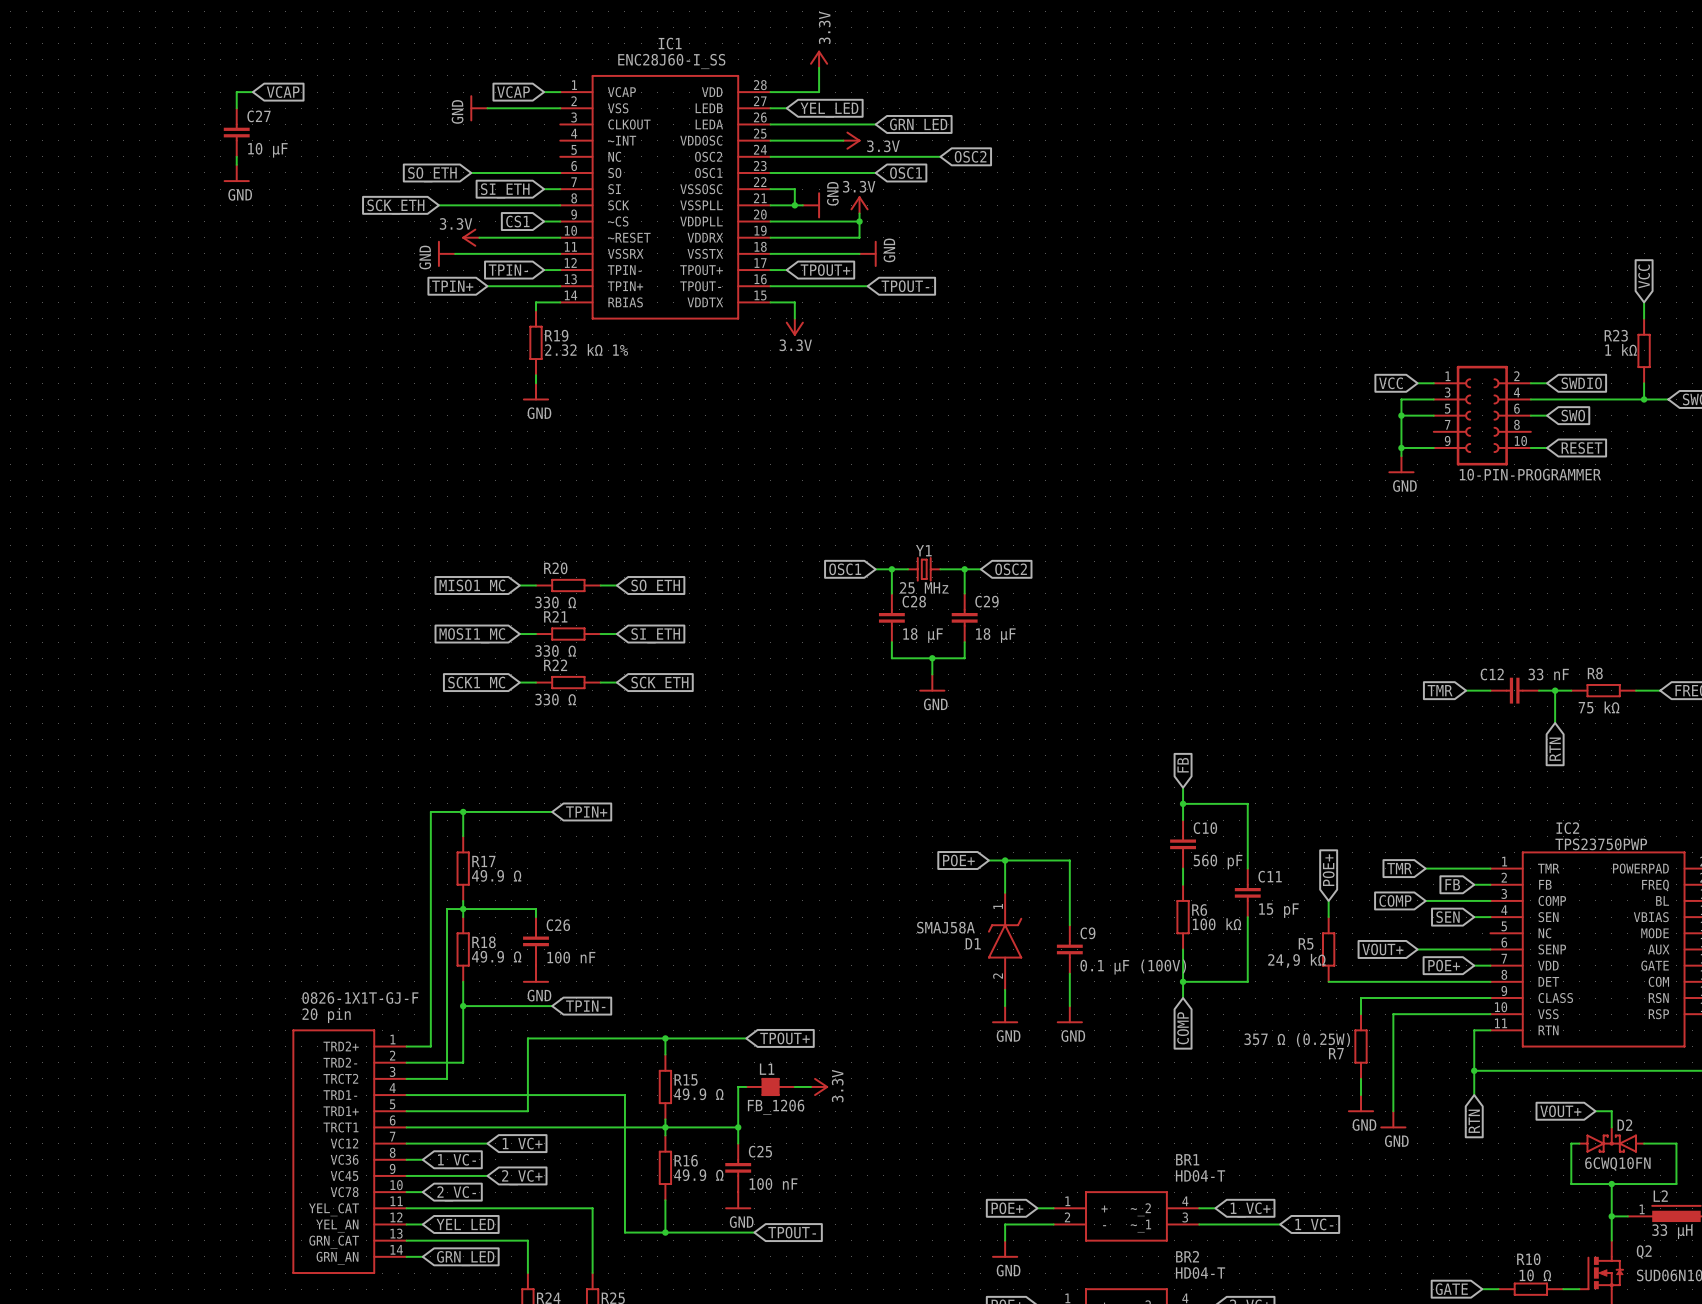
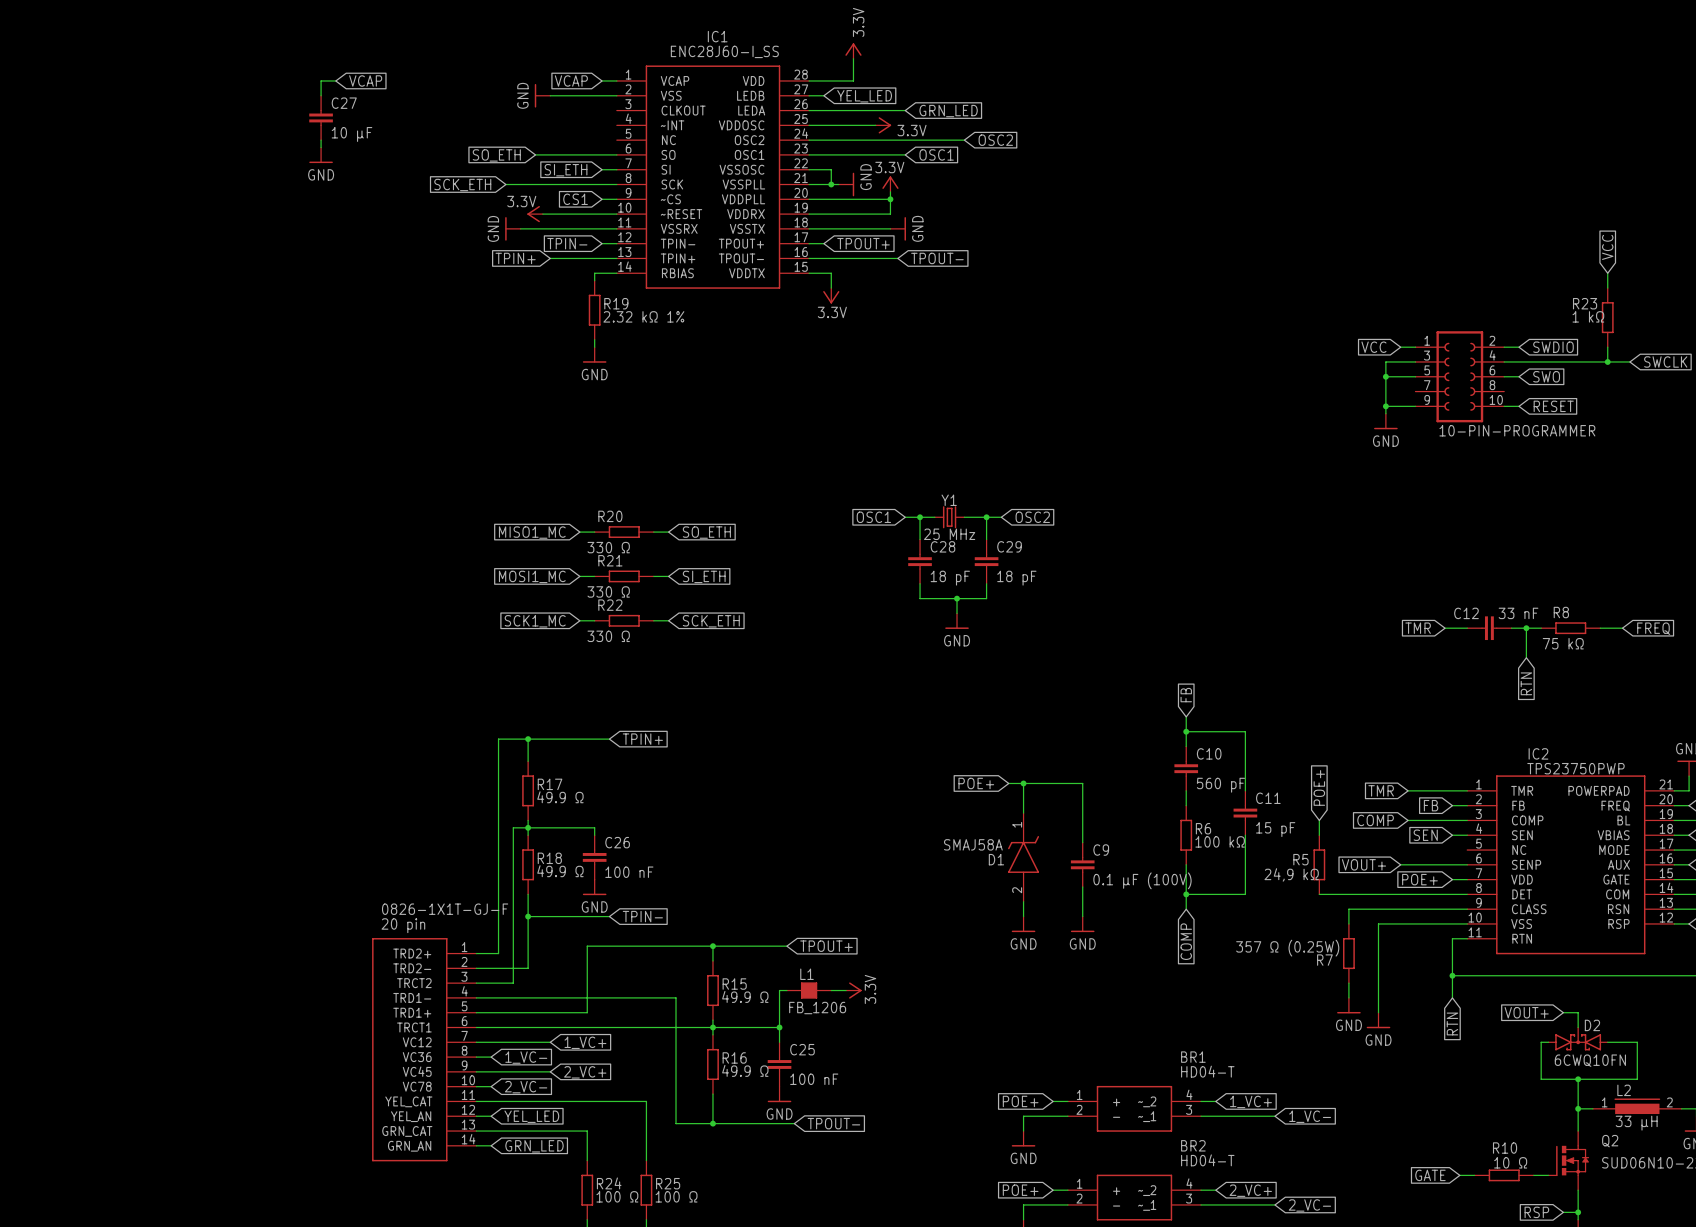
C28 value: 18 µF (923, 635) -> 18 pF (950, 578)
C29 value: 18 µF (995, 635) -> 18 pF (1016, 578)

